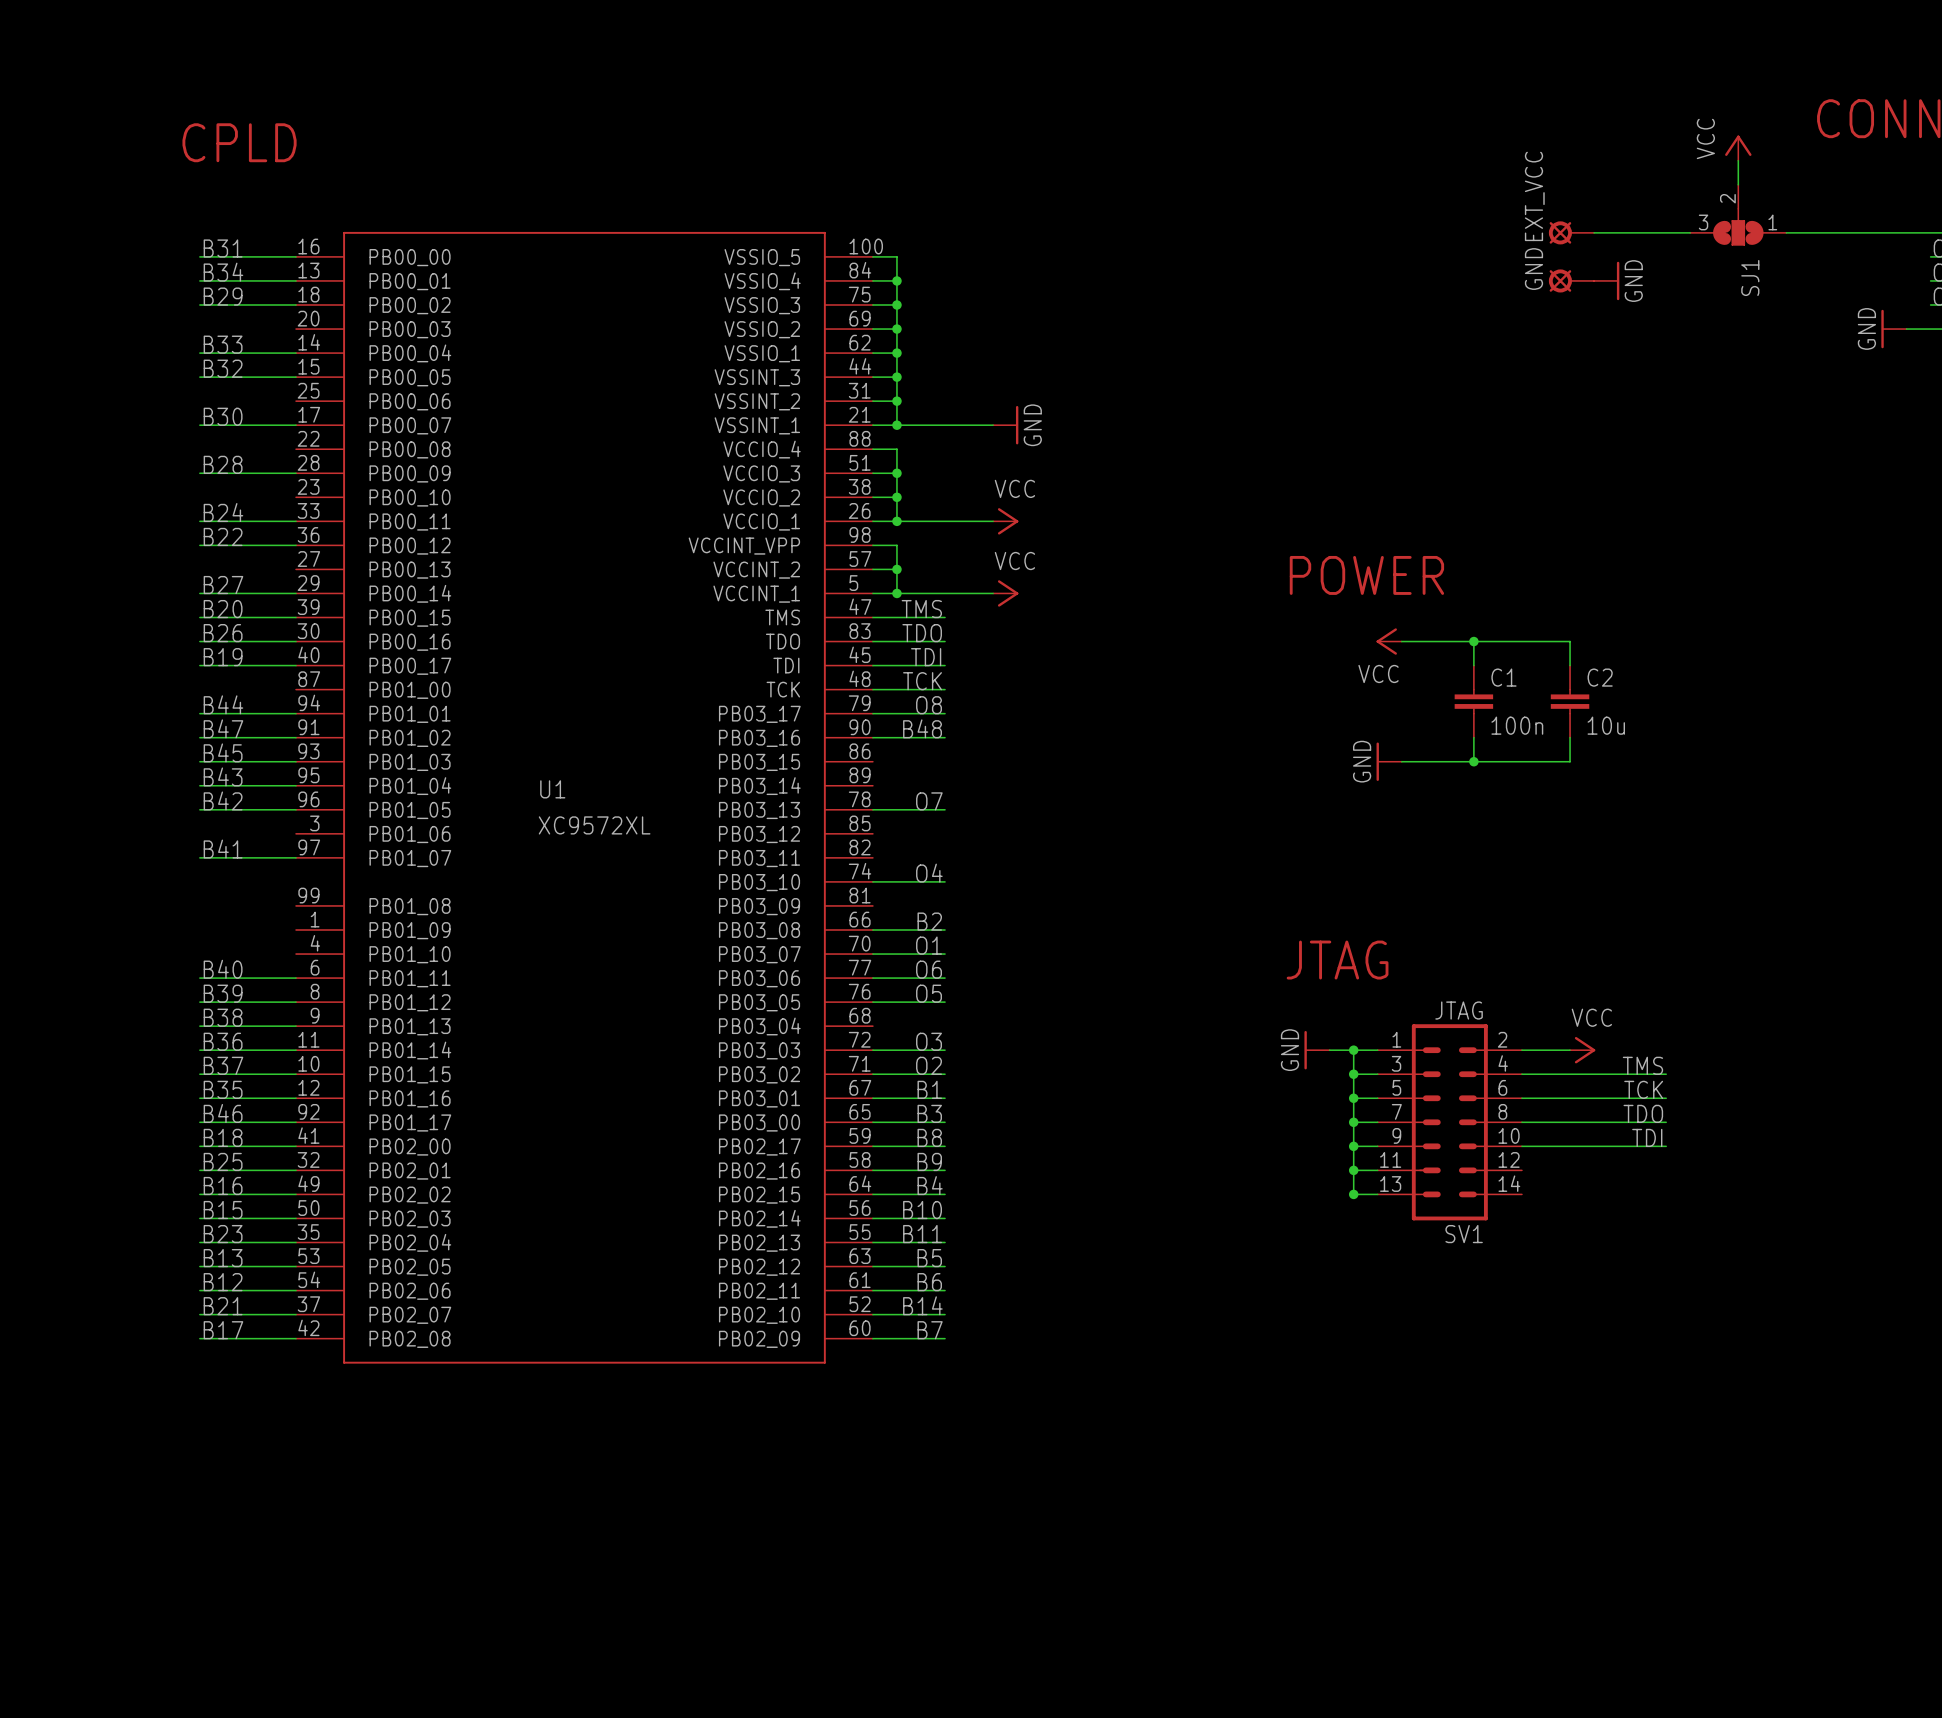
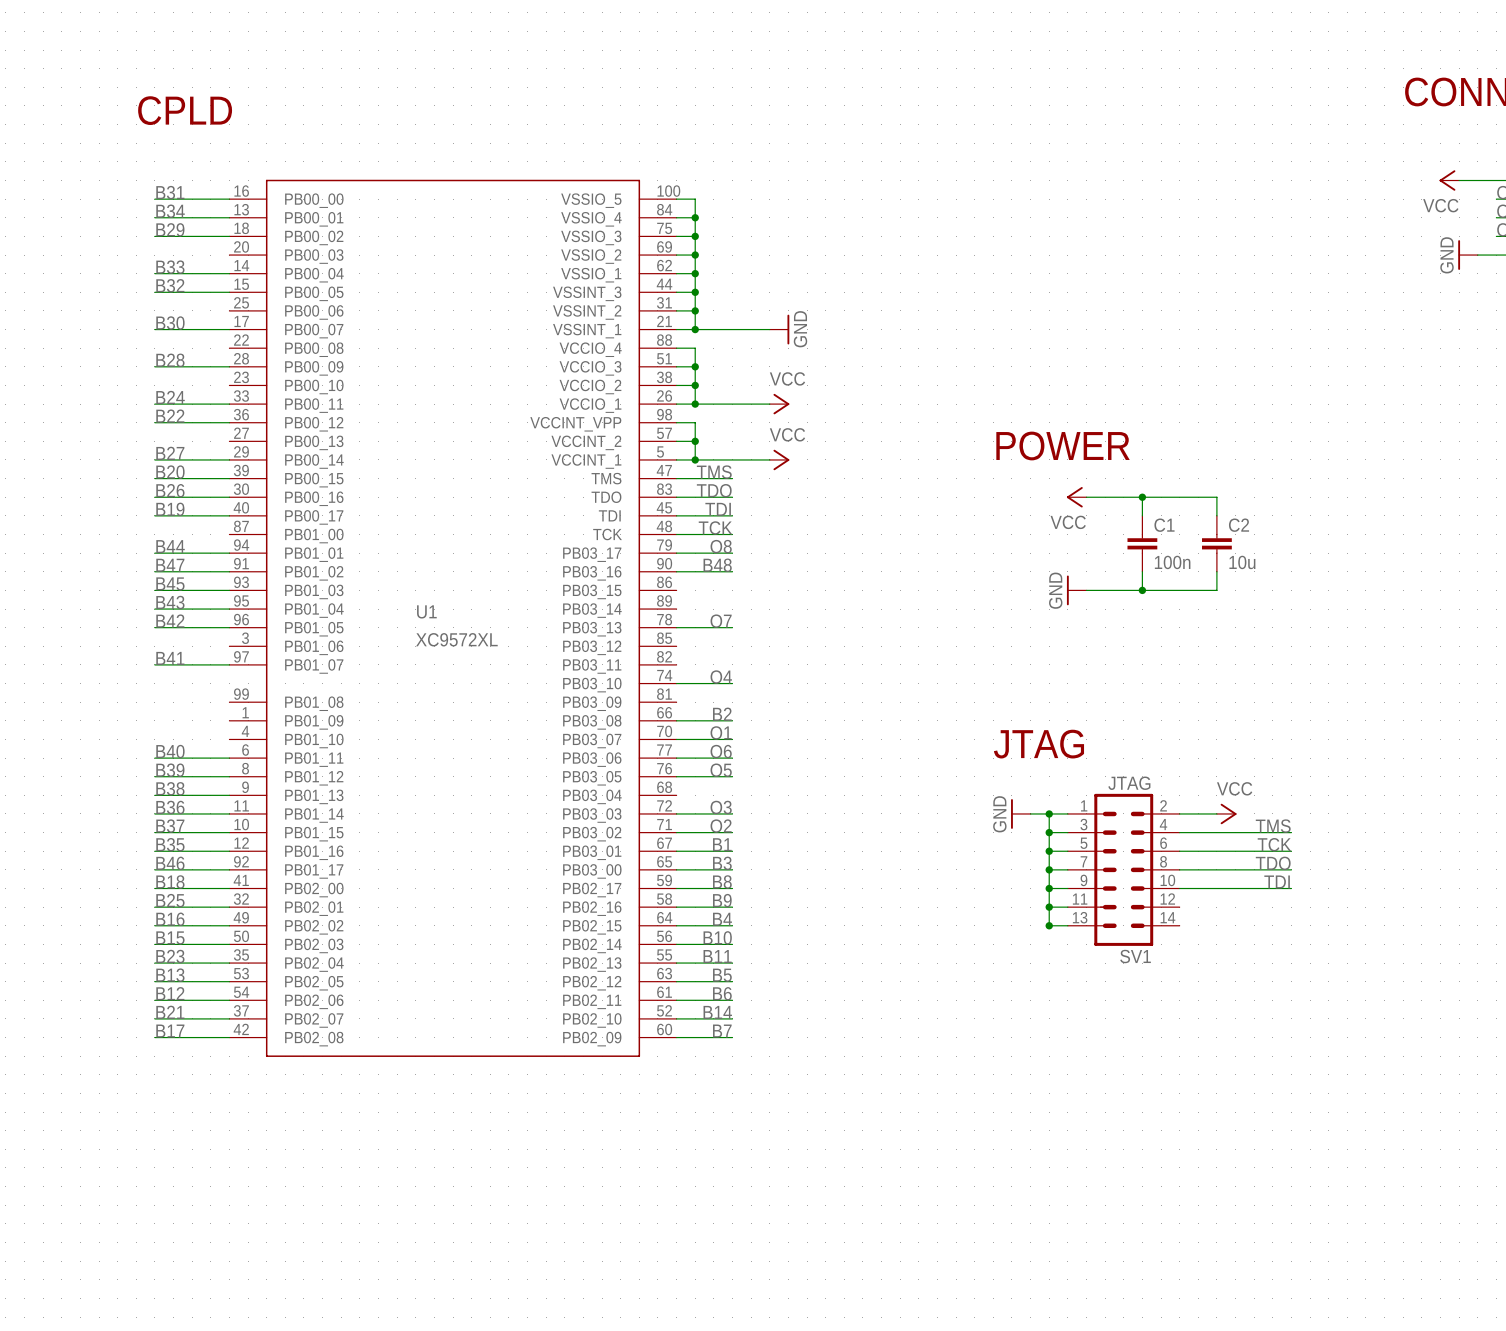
power symbol rotation: 0° (1738, 145) -> 90° counterclockwise (1447, 180)
power symbol position: VCC (1738, 148) -> VCC (1449, 180)
wire: (1738, 160) (1738, 184) -> none
SJ1: (1738, 215) -> none
EXT_VCC: (1571, 232) -> none
wire: (1594, 232) (1690, 232) -> none
wire: (1786, 232) (1882, 232) -> none
GND: (1571, 280) -> none
power symbol: GND (1606, 280) -> none

